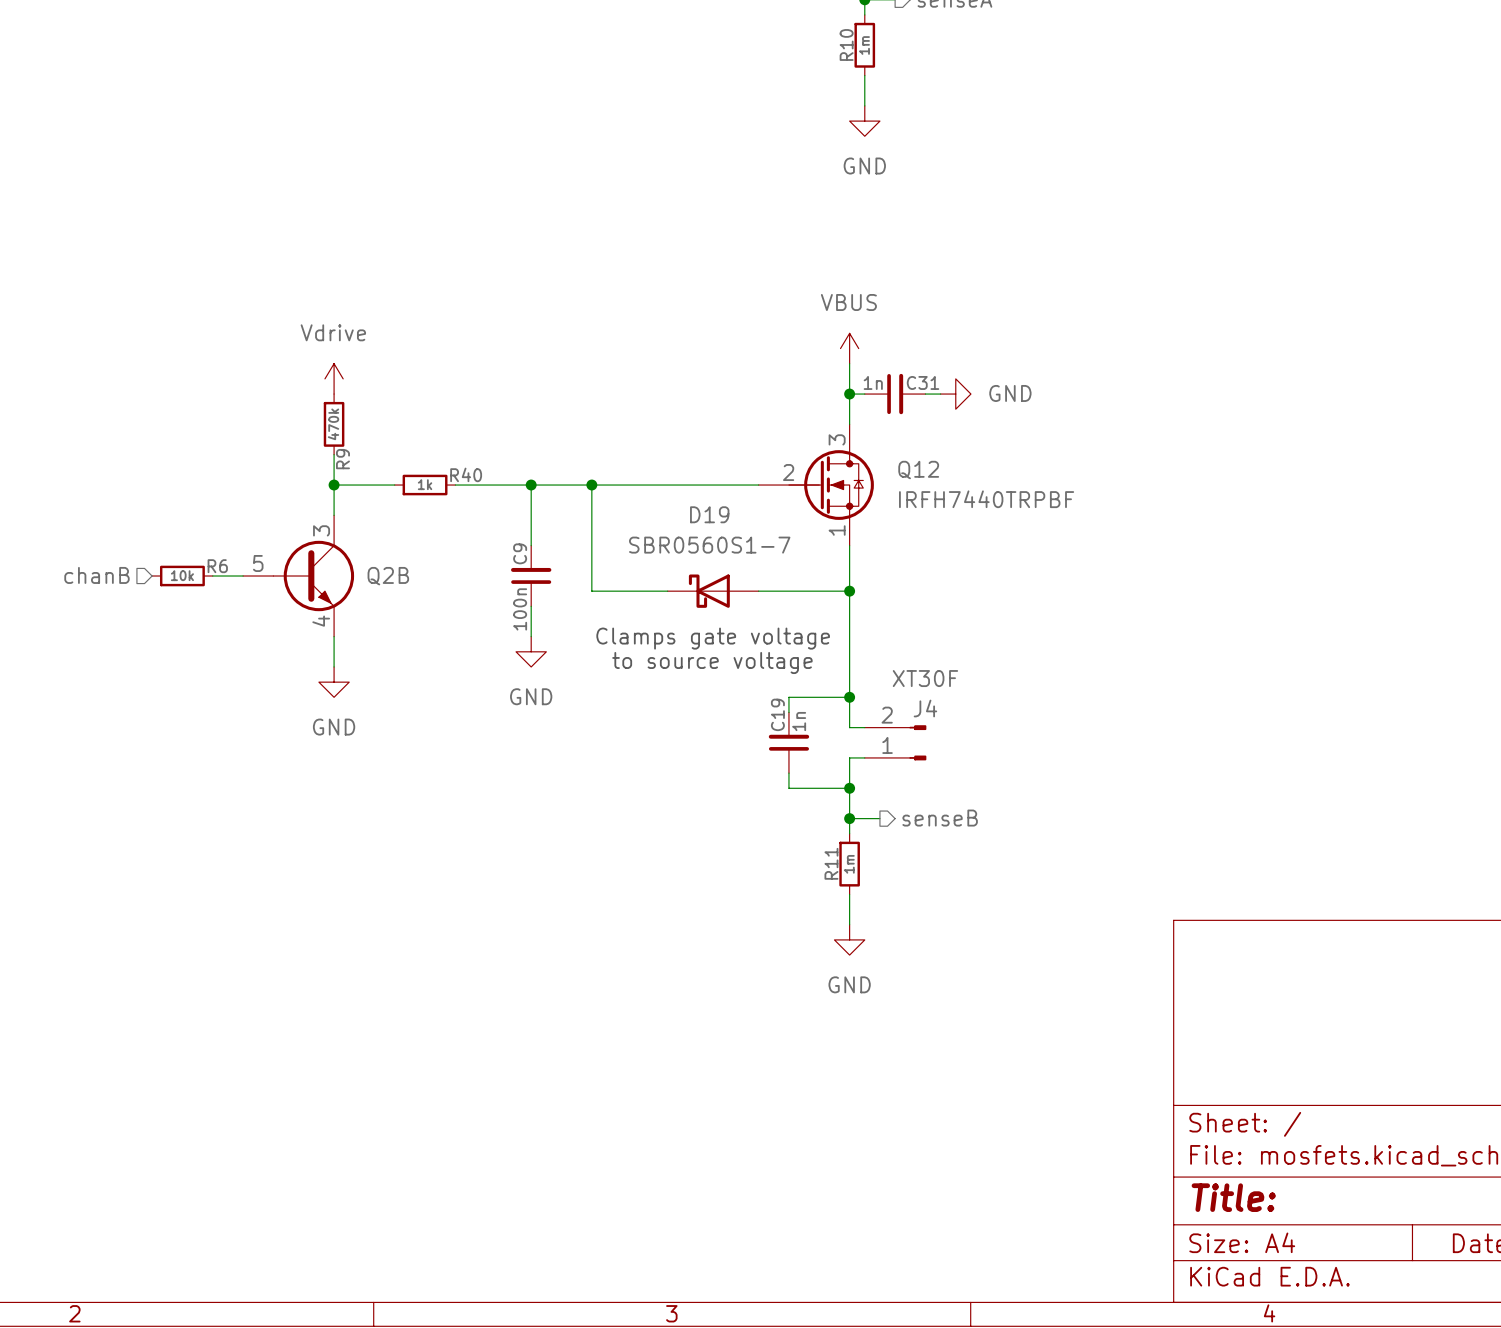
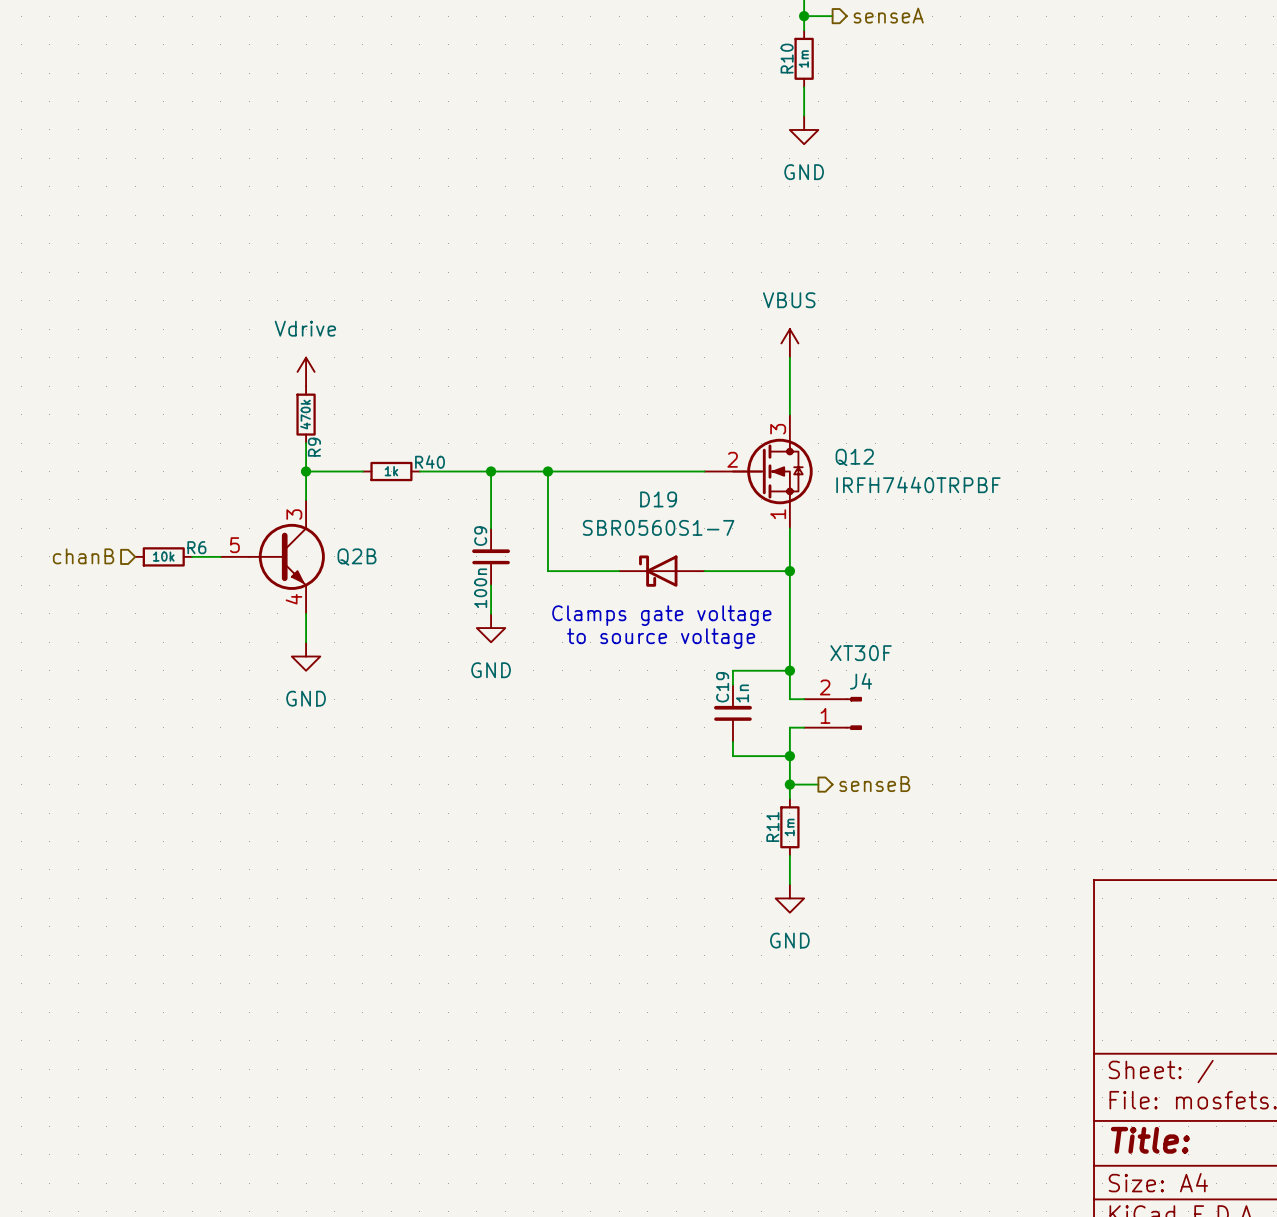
wire: (849, 394) (864, 394) -> none
junction: (849, 394) -> none
C31: 1n (895, 394) -> none
wire: (925, 394) (940, 394) -> none
power symbol: GND (955, 394) -> none

